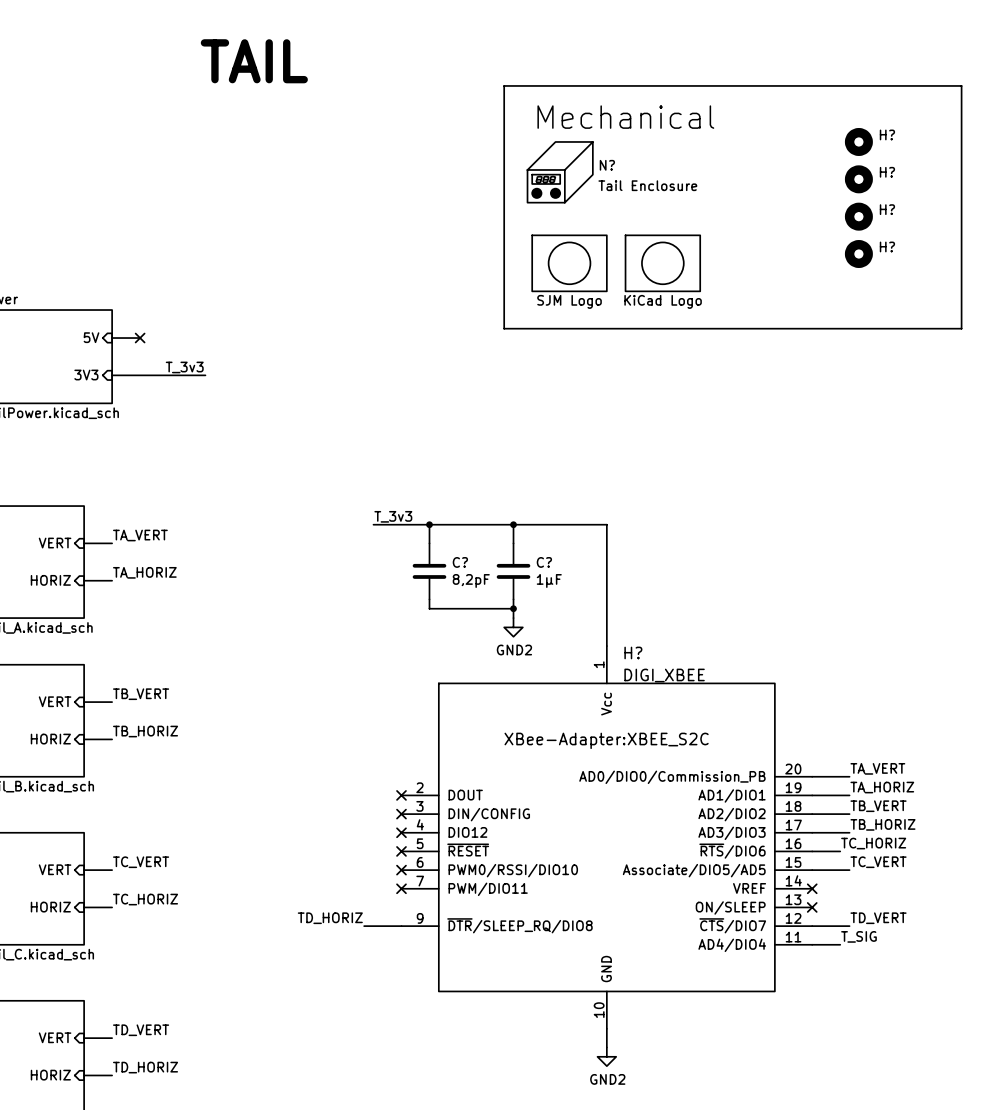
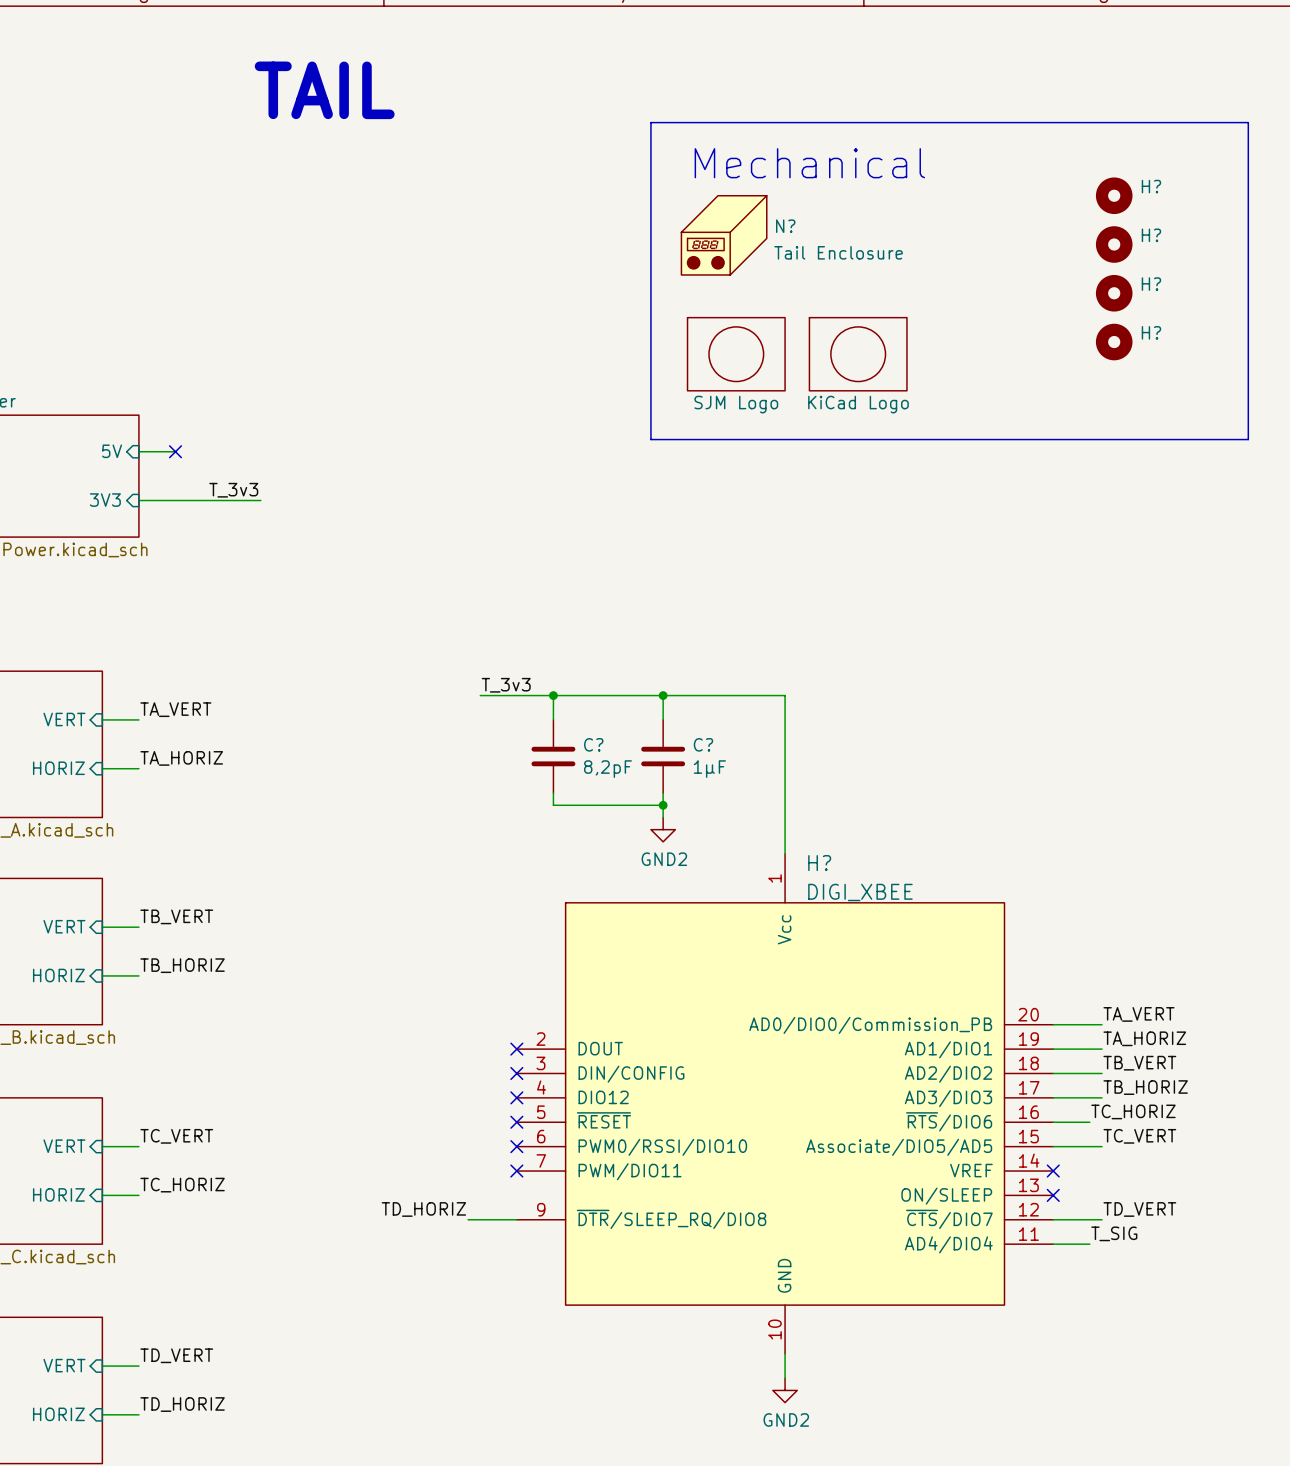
H? text: XBee-Adapter:XBEE_S2C (606, 740) -> none

